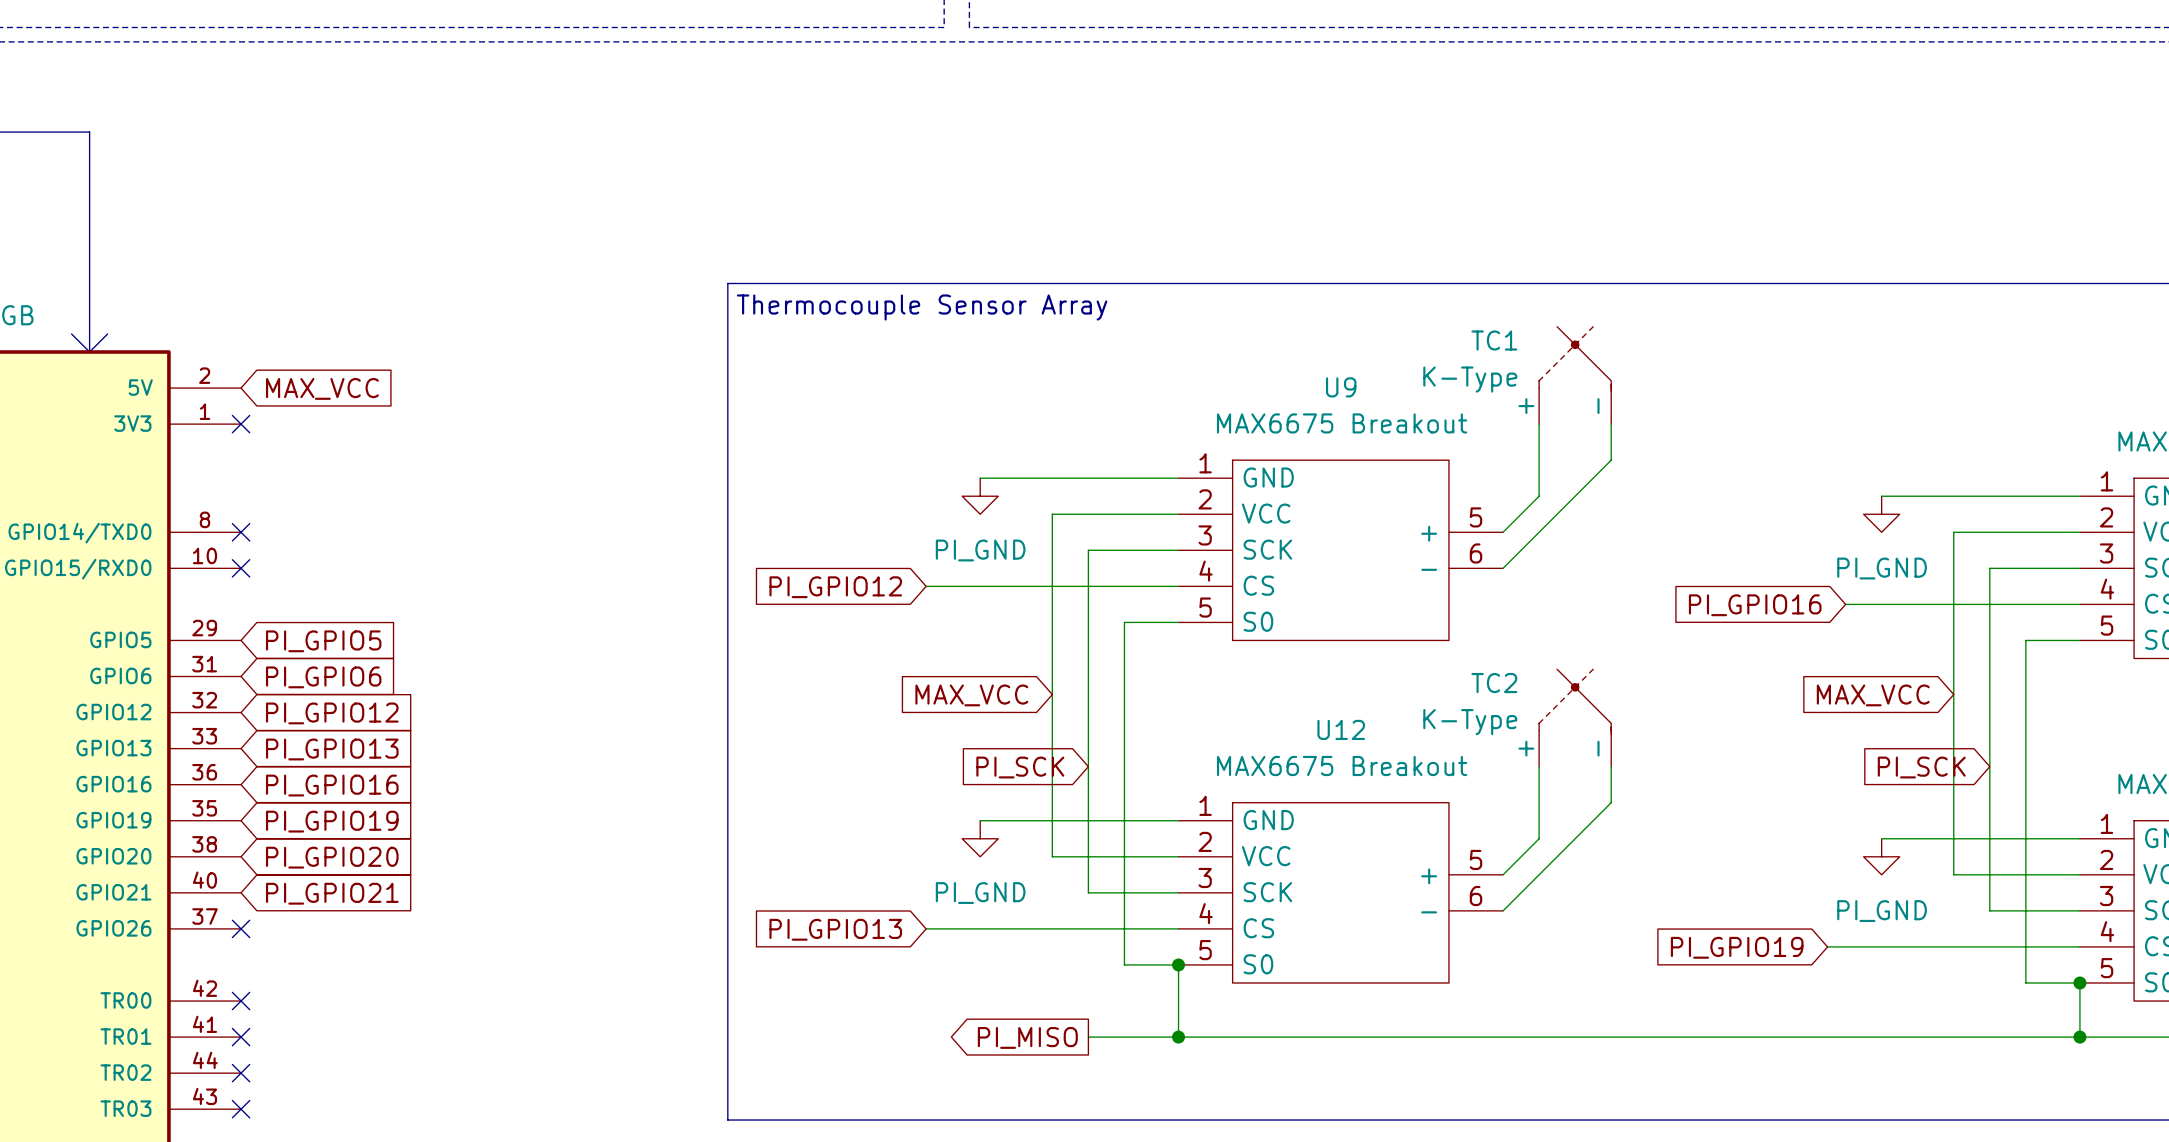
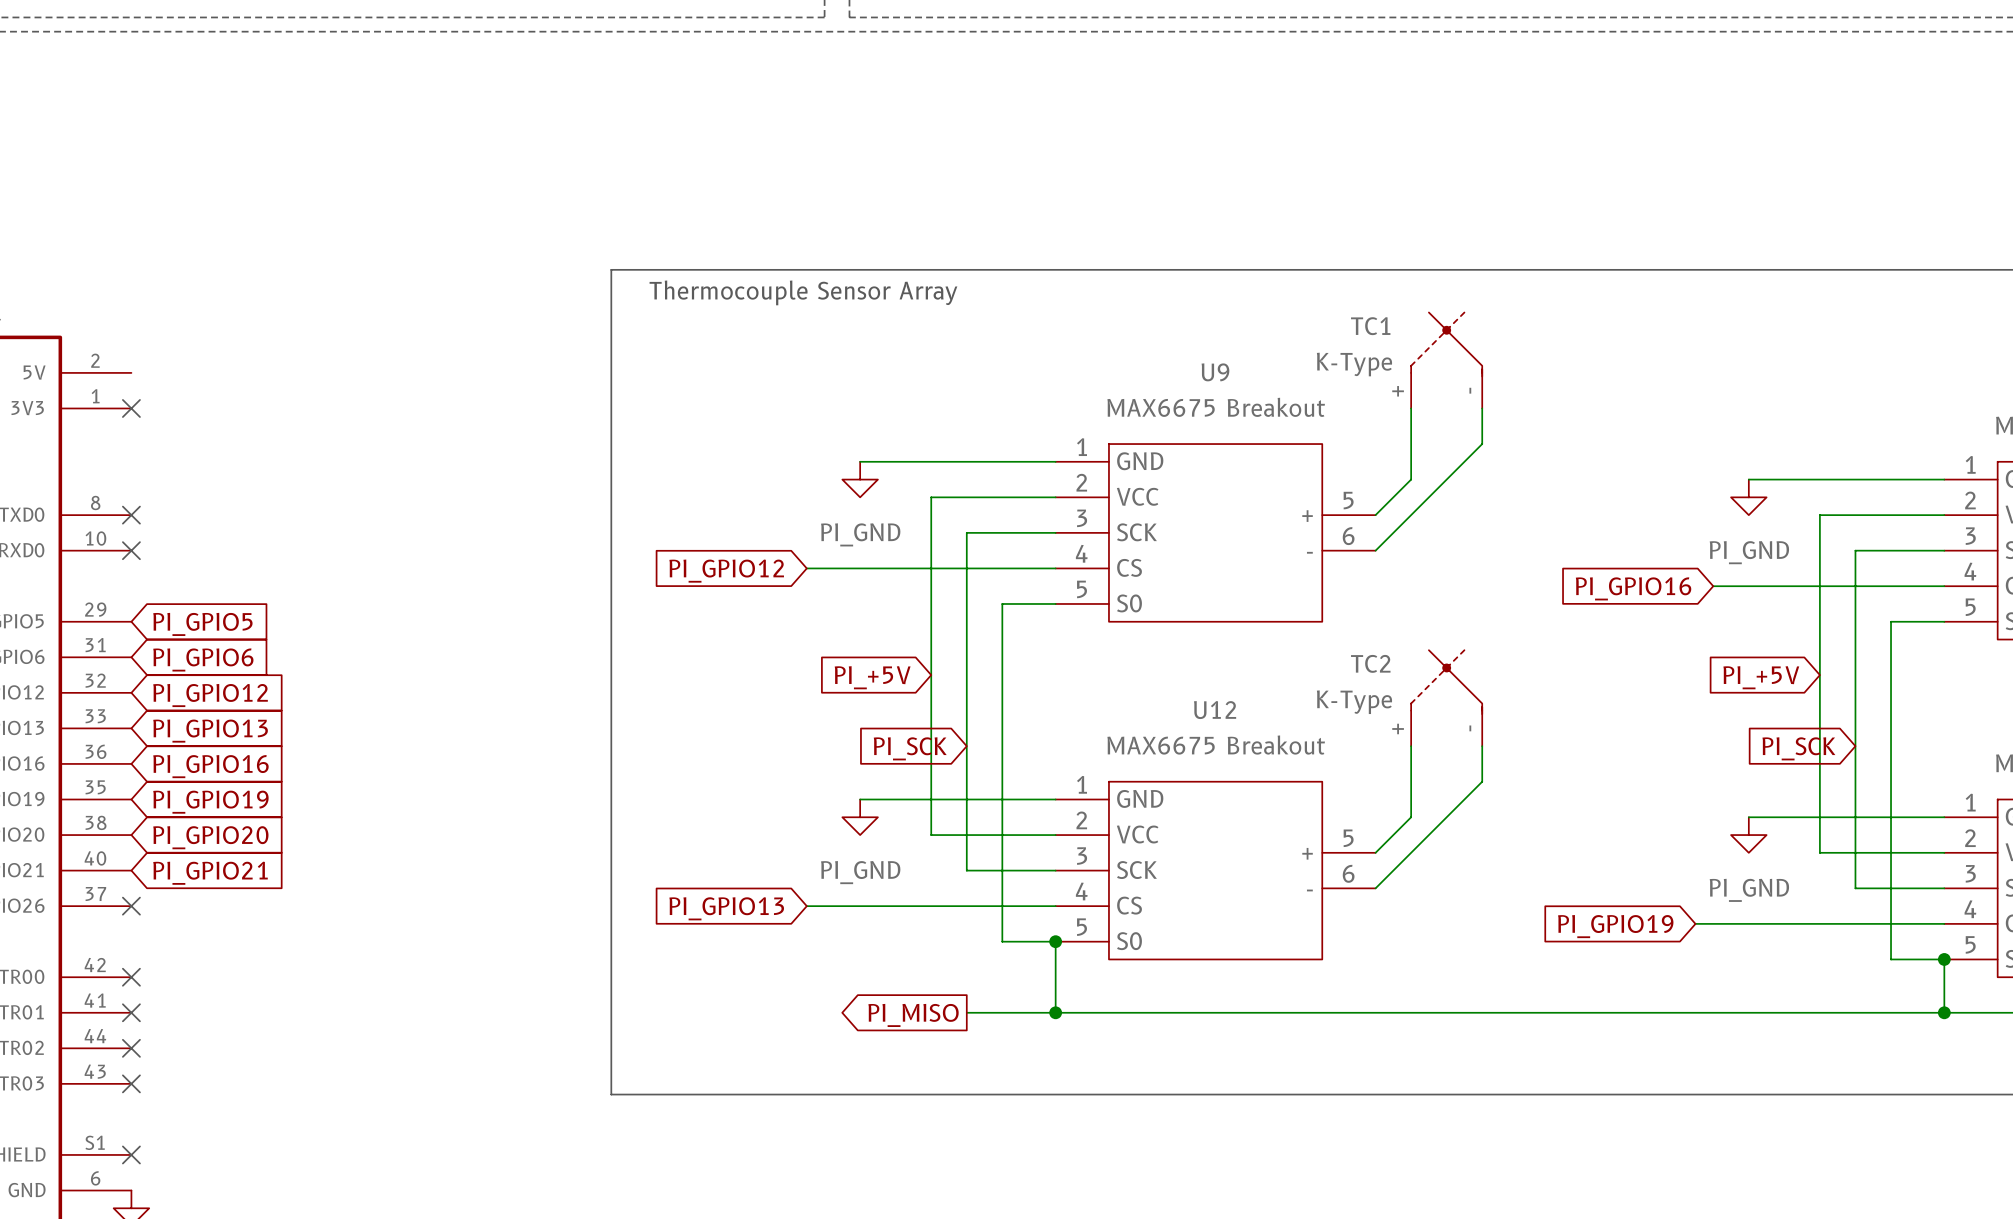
global label: MAX_VCC (322, 388) -> none
global label: MAX_VCC (971, 695) -> PI_+5V (872, 677)
global label: MAX_VCC (1873, 695) -> PI_+5V (1761, 677)

